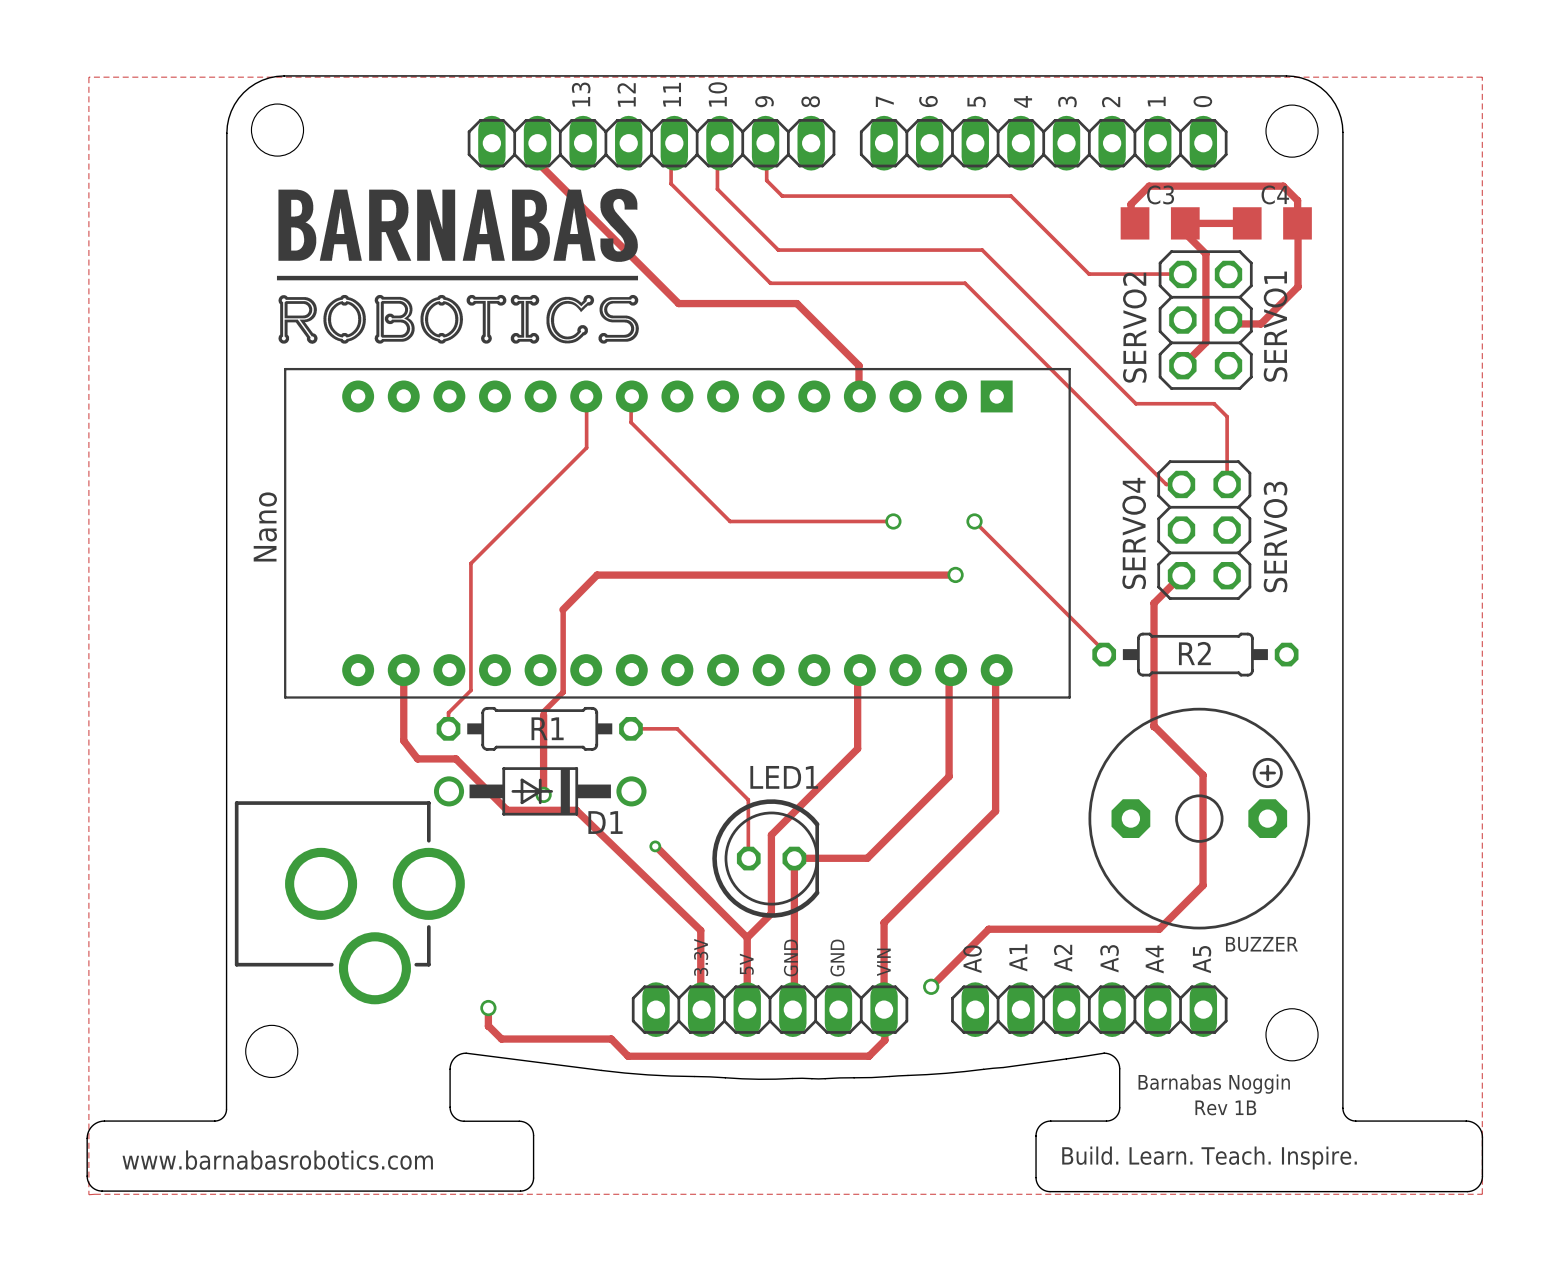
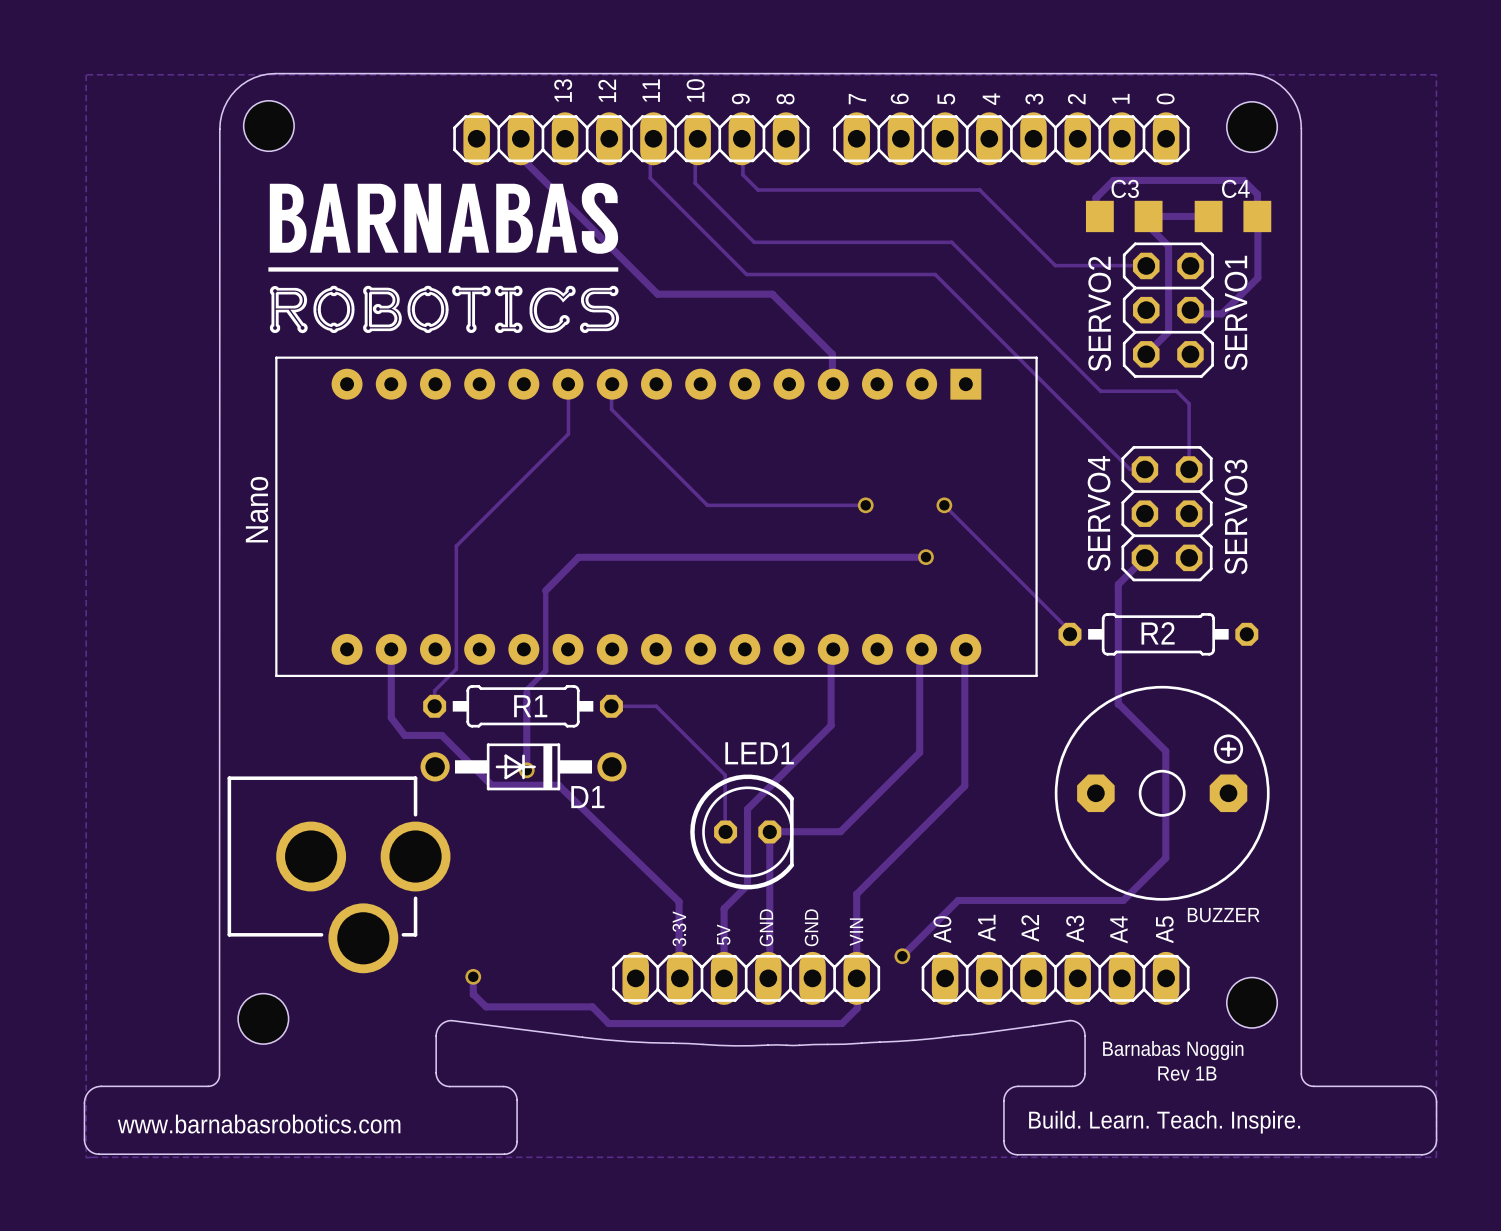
via: (655, 846) -> none
track: (656, 847) (747, 937) -> none

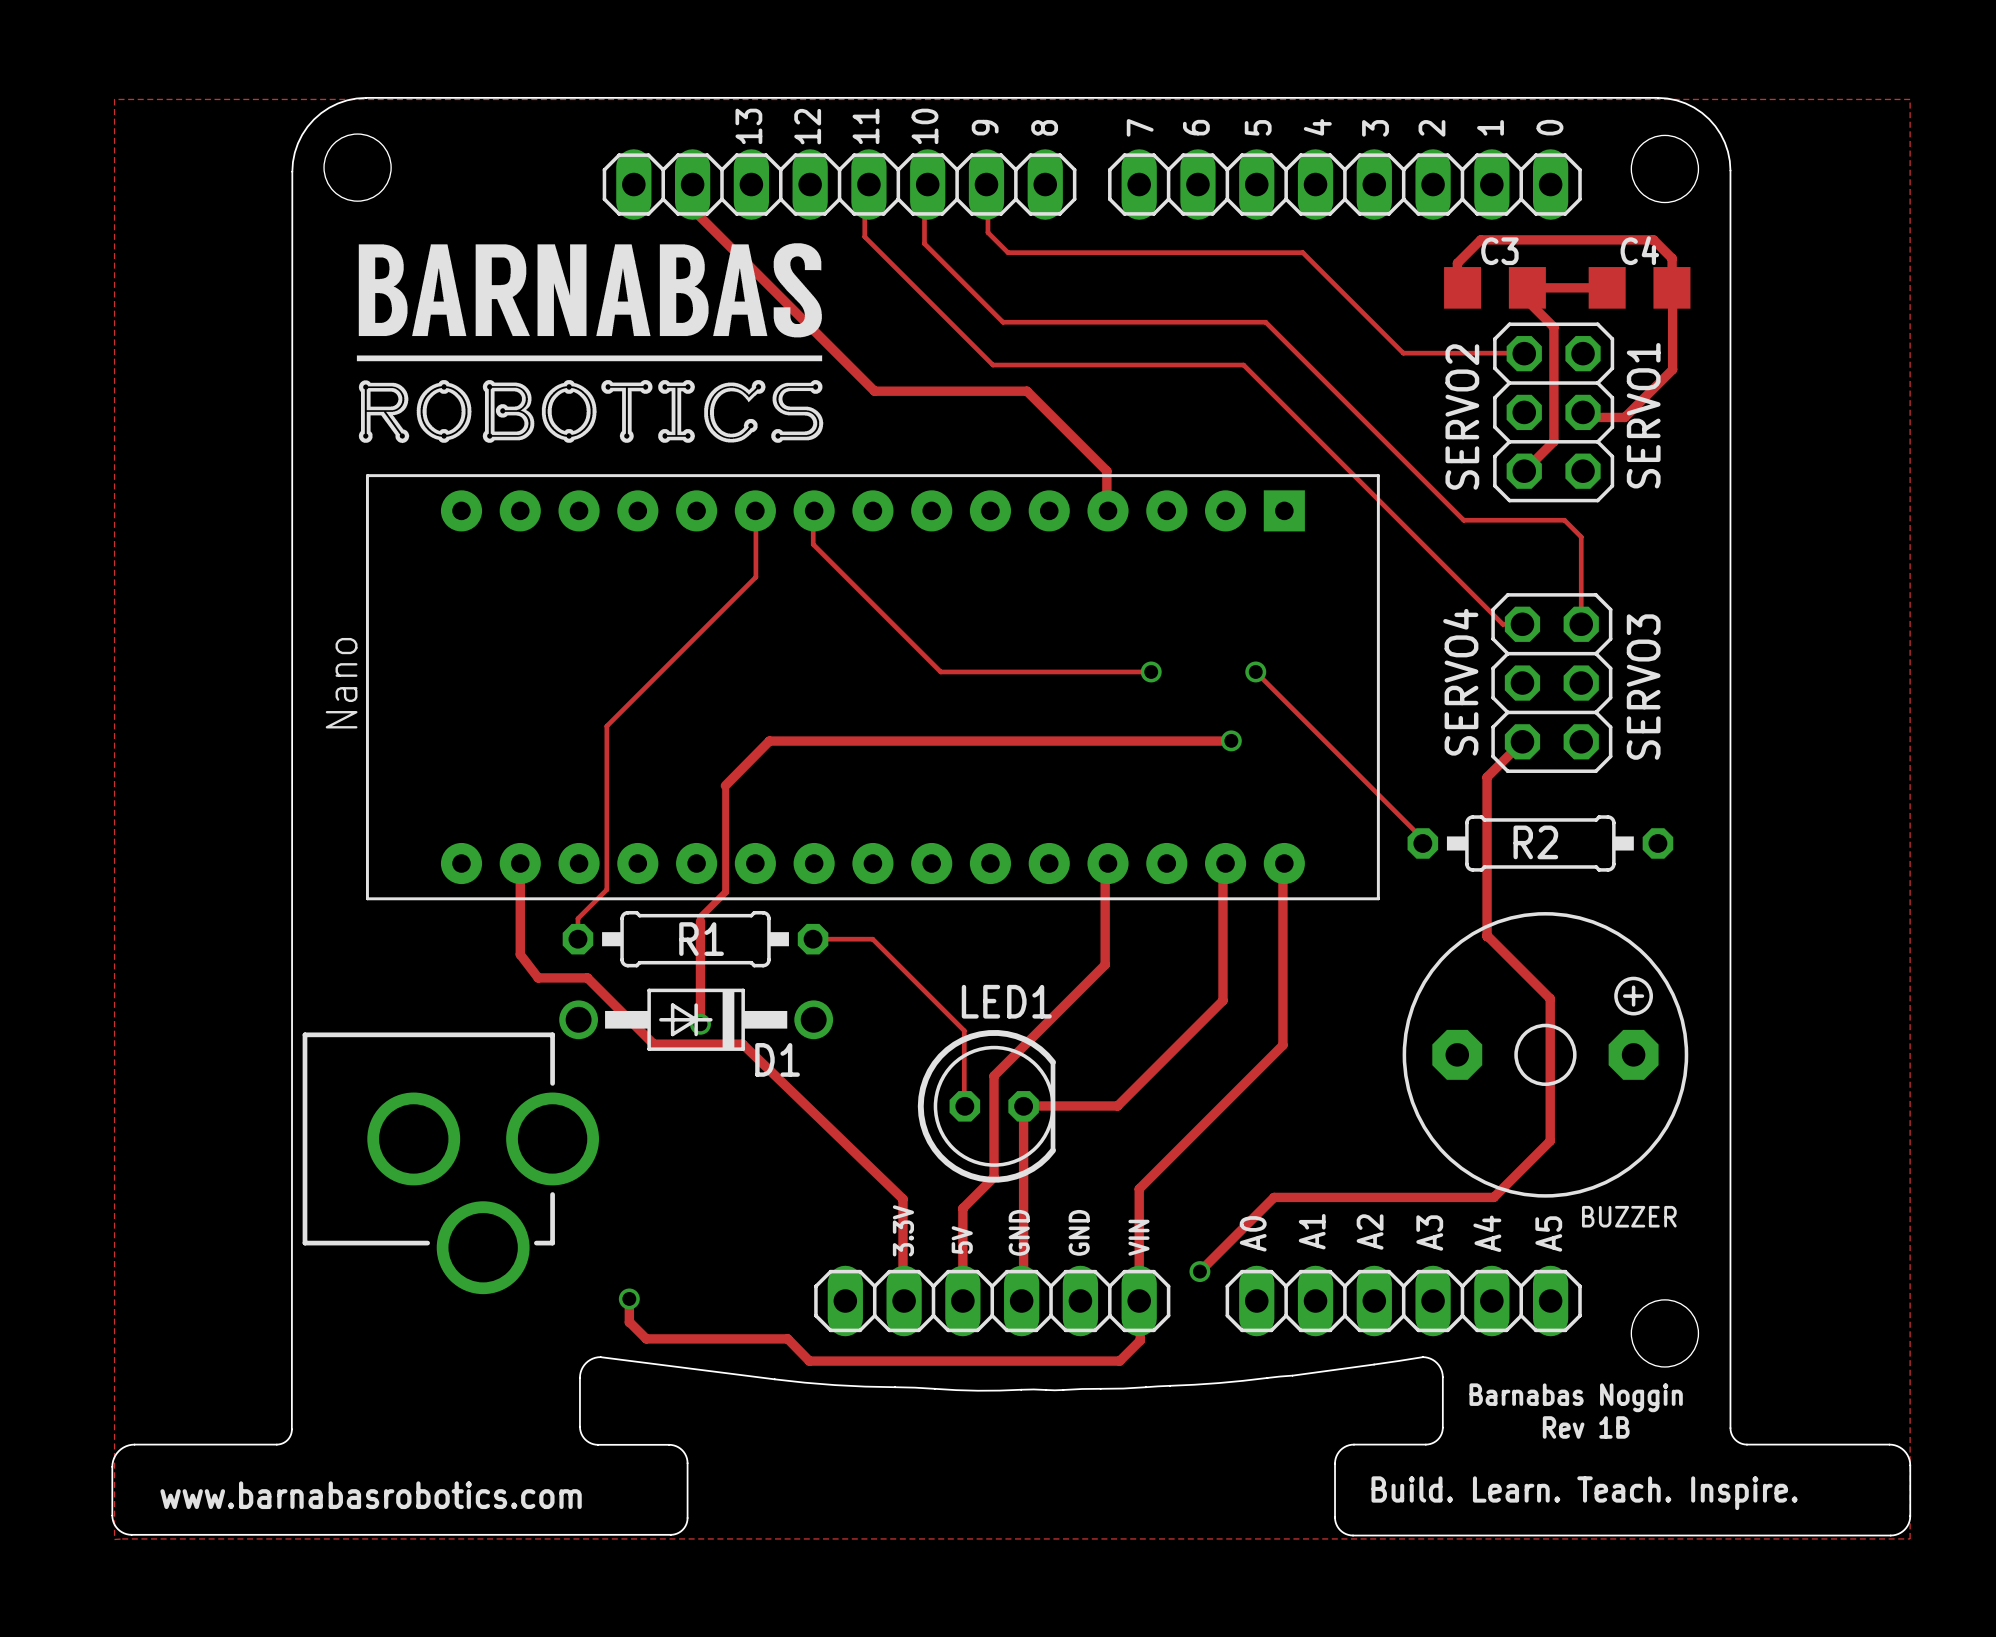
hole: (263, 1018) -> none

